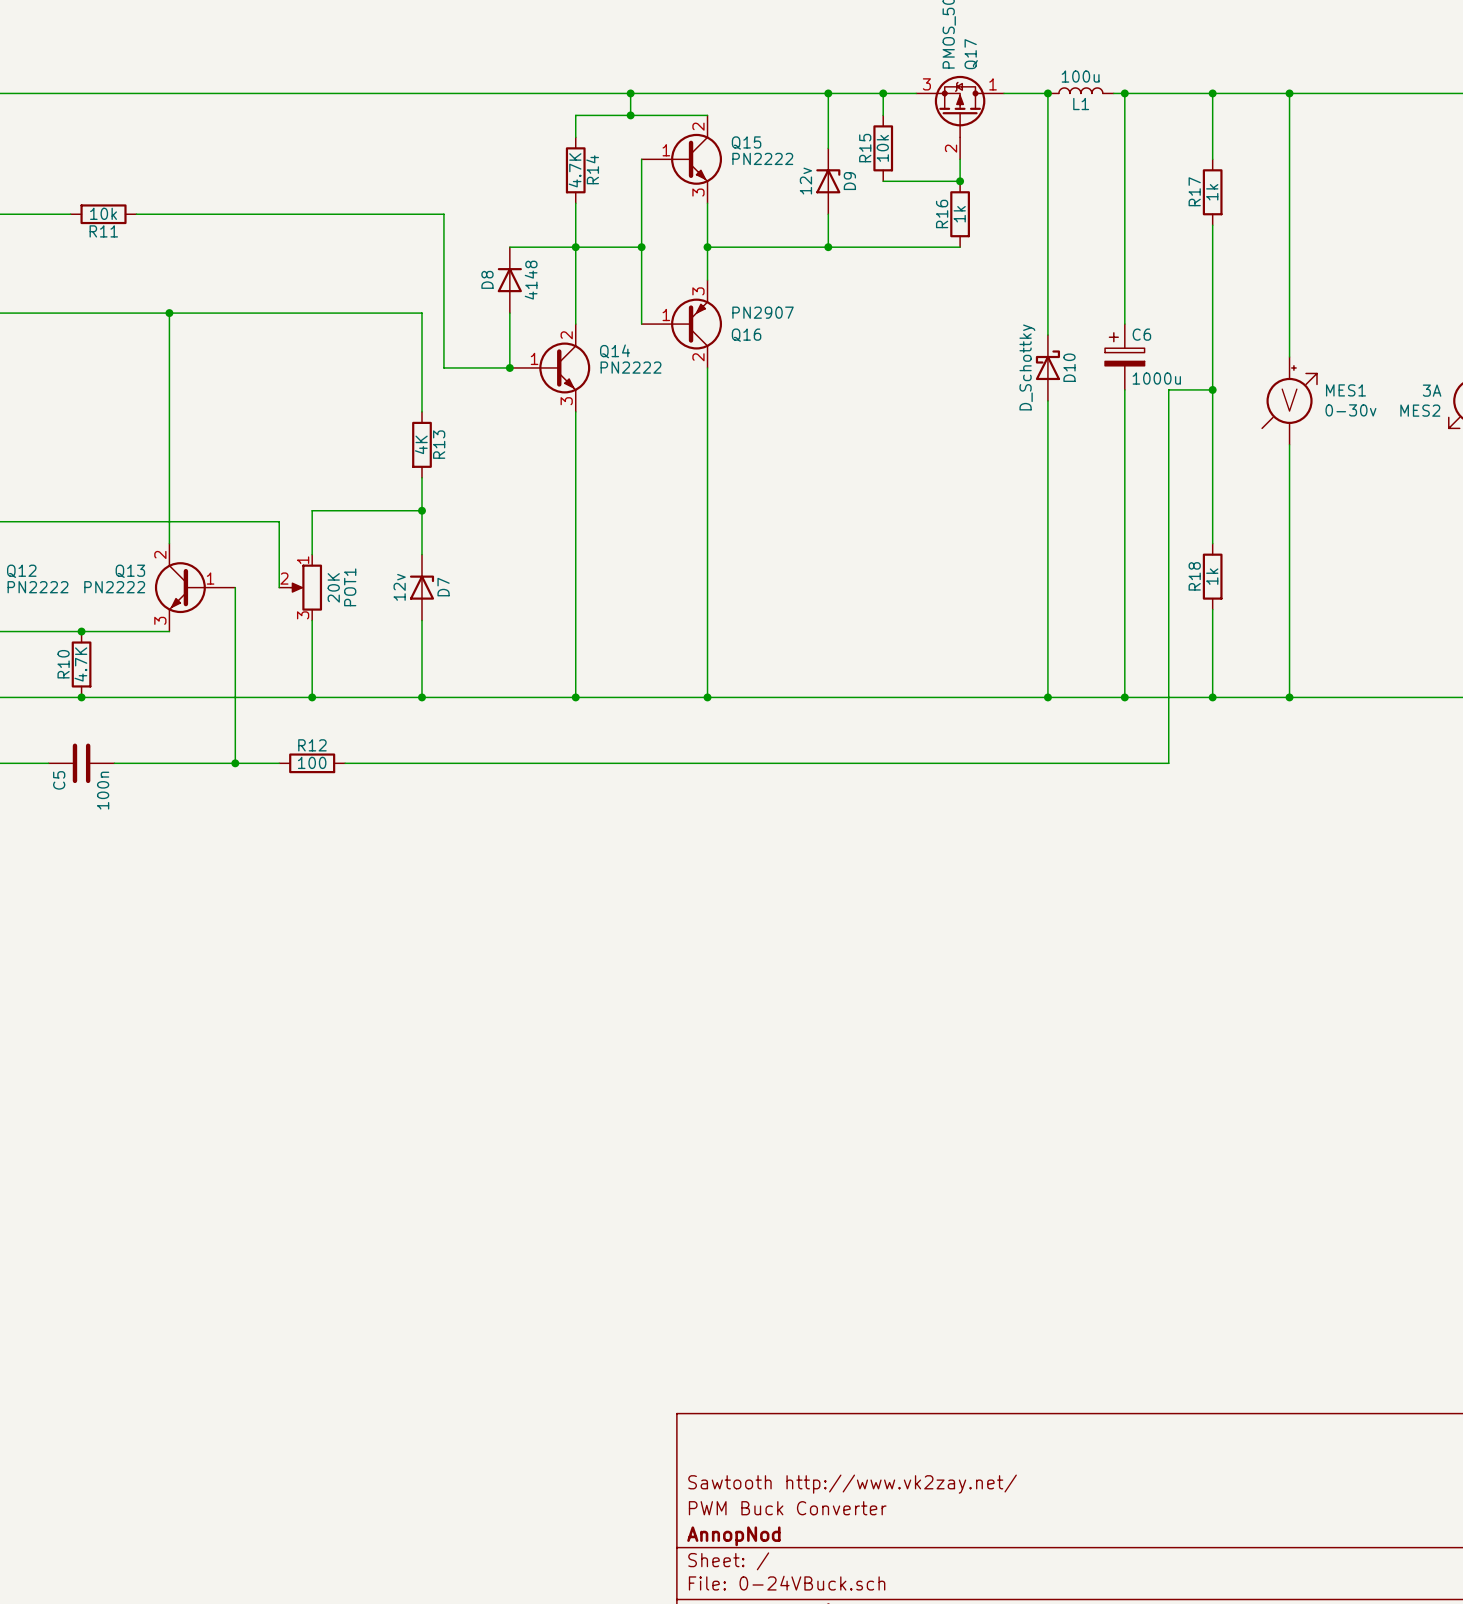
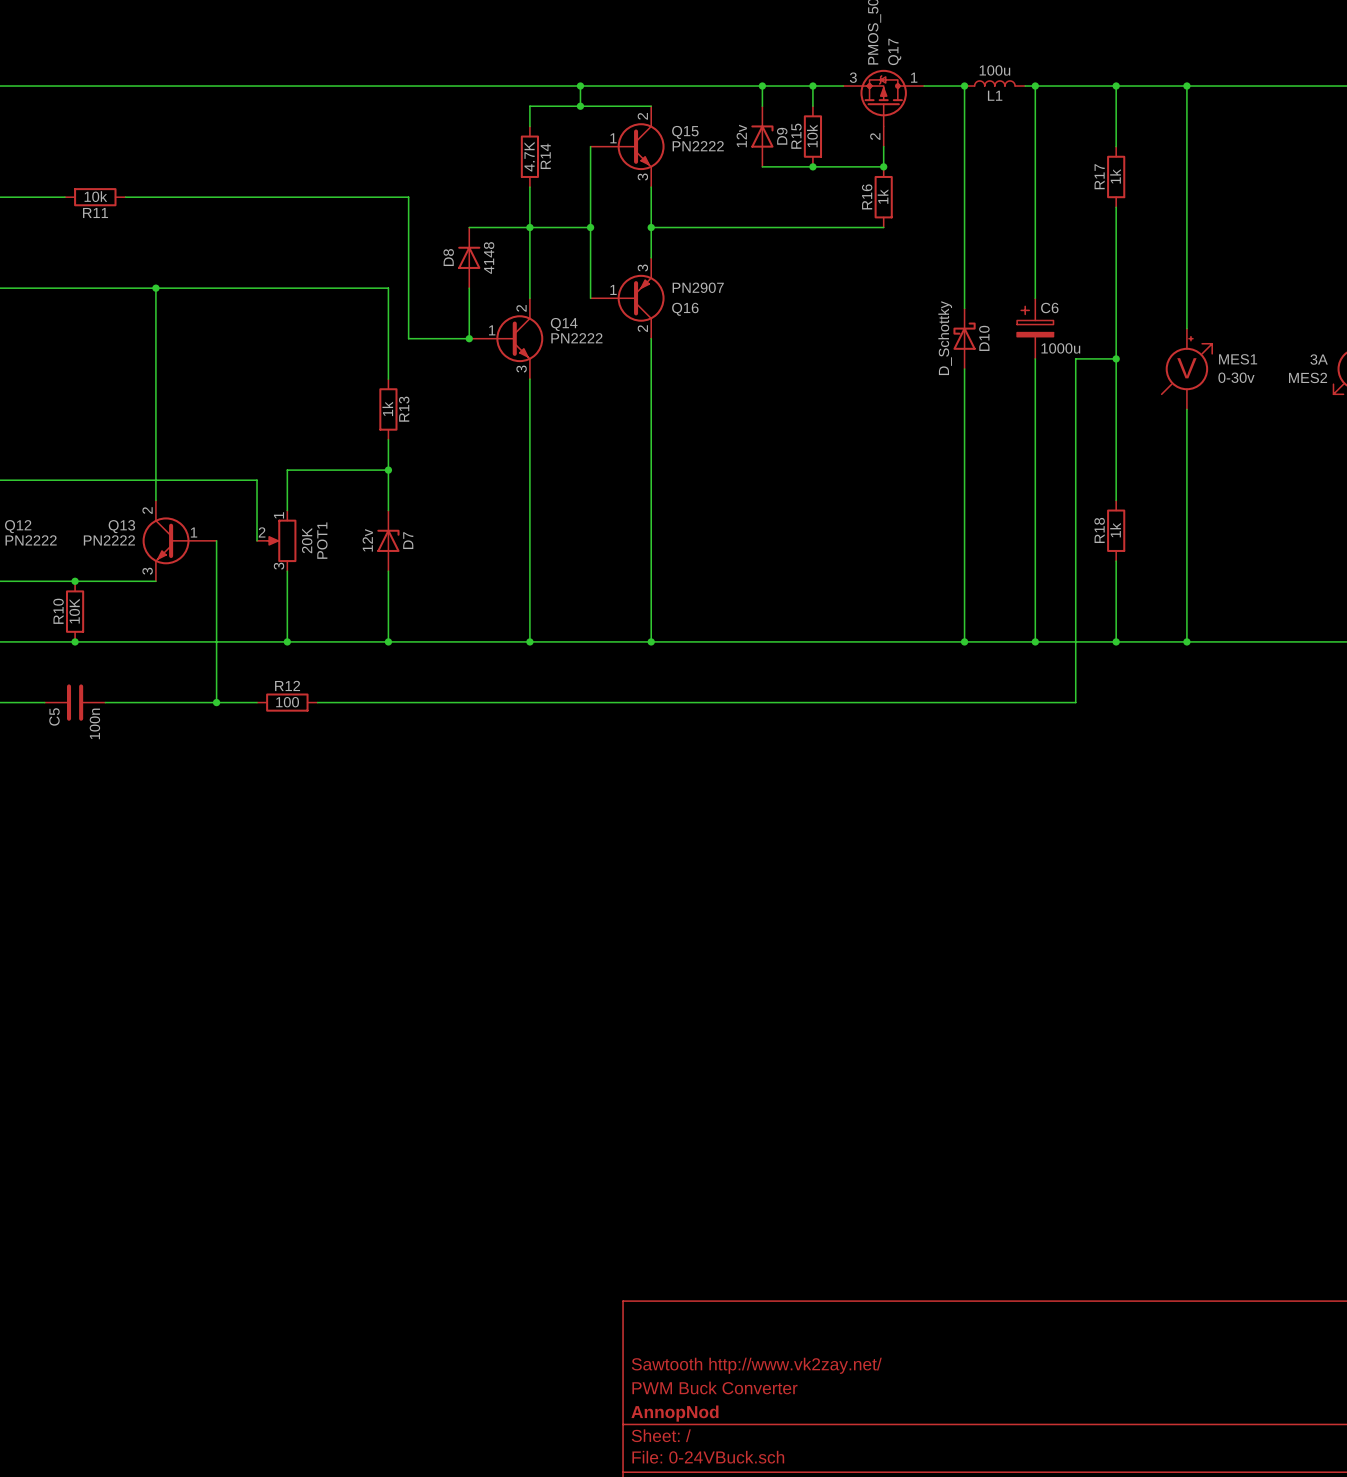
wire: none -> (762, 166) (812, 166)
D9 position: (828, 181) -> (762, 136)
junction: none -> (812, 166)
wire: (828, 214) (828, 247) -> none
junction: (828, 247) -> none
R13 value: 4K (421, 444) -> 1k (387, 408)
R10 value: 4.7K (80, 664) -> 10K (74, 611)

